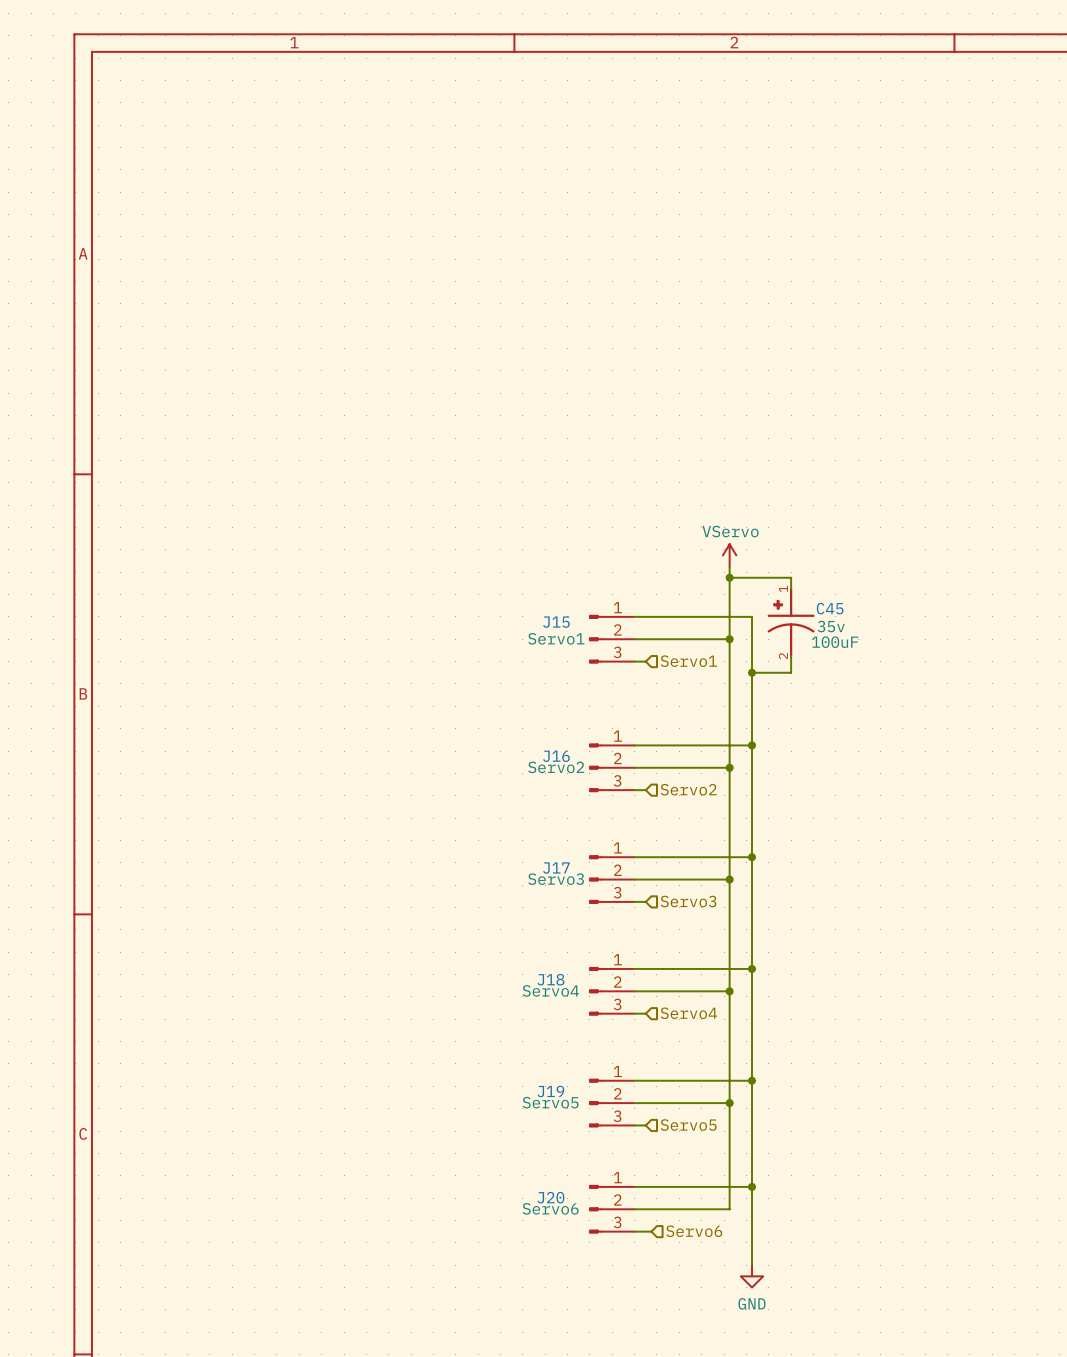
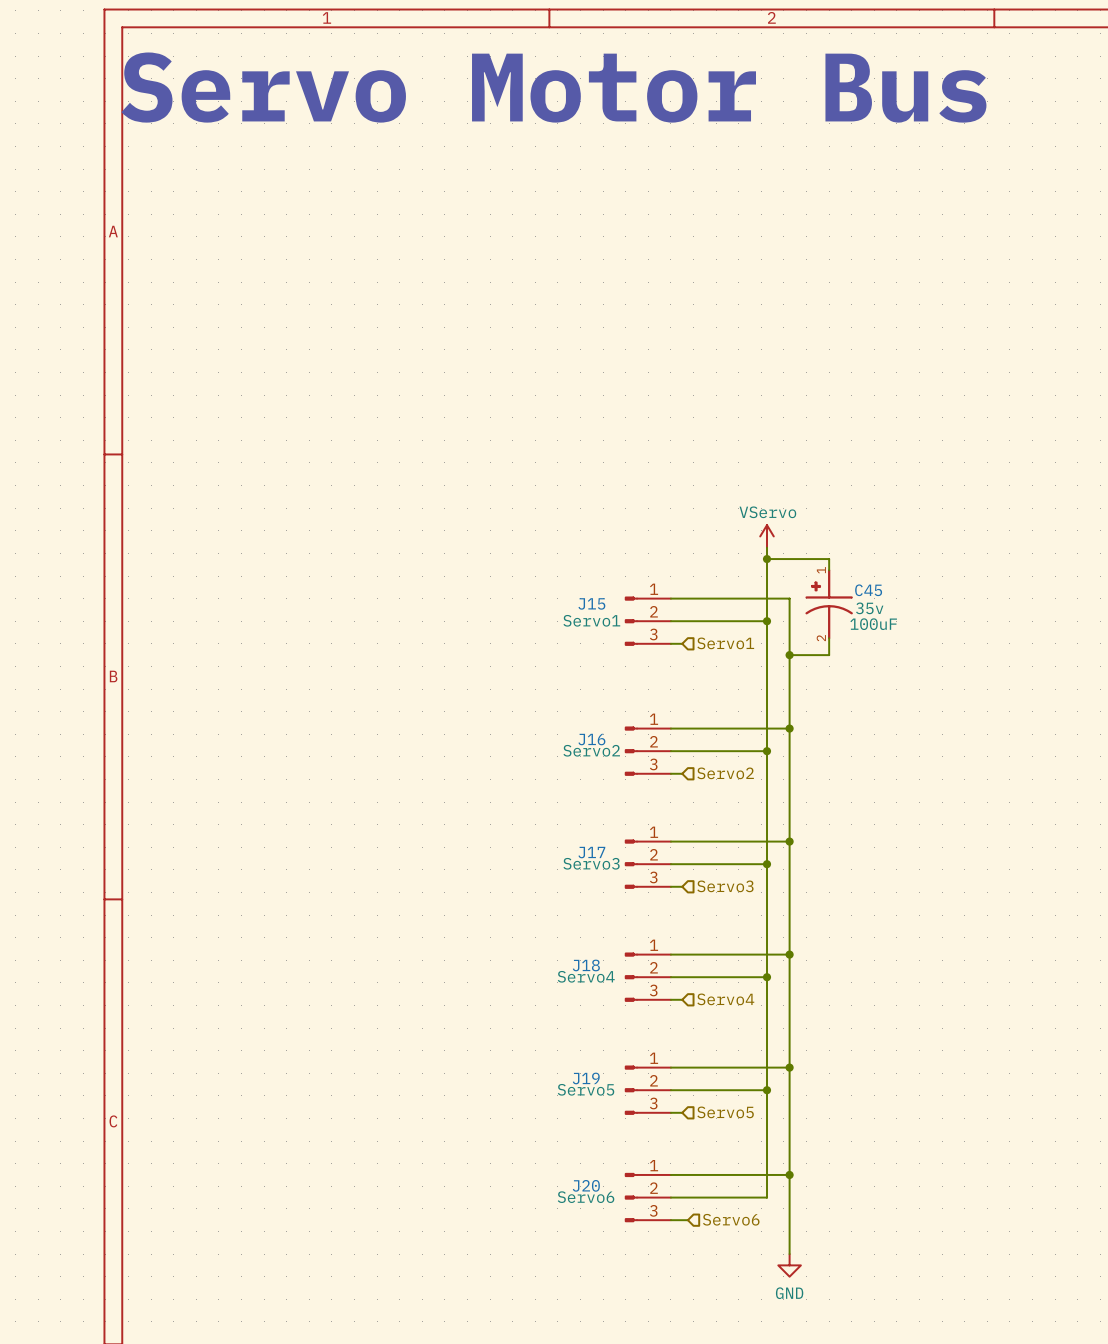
text: none -> Servo Motor Bus (553, 87)

